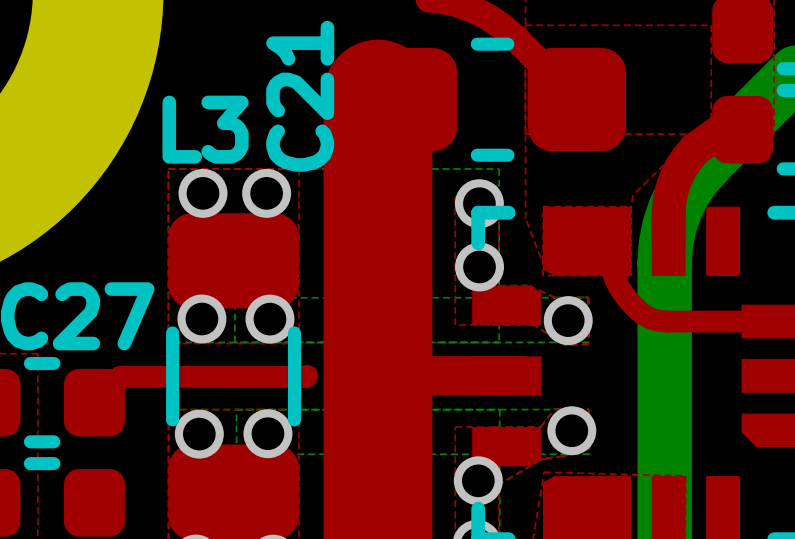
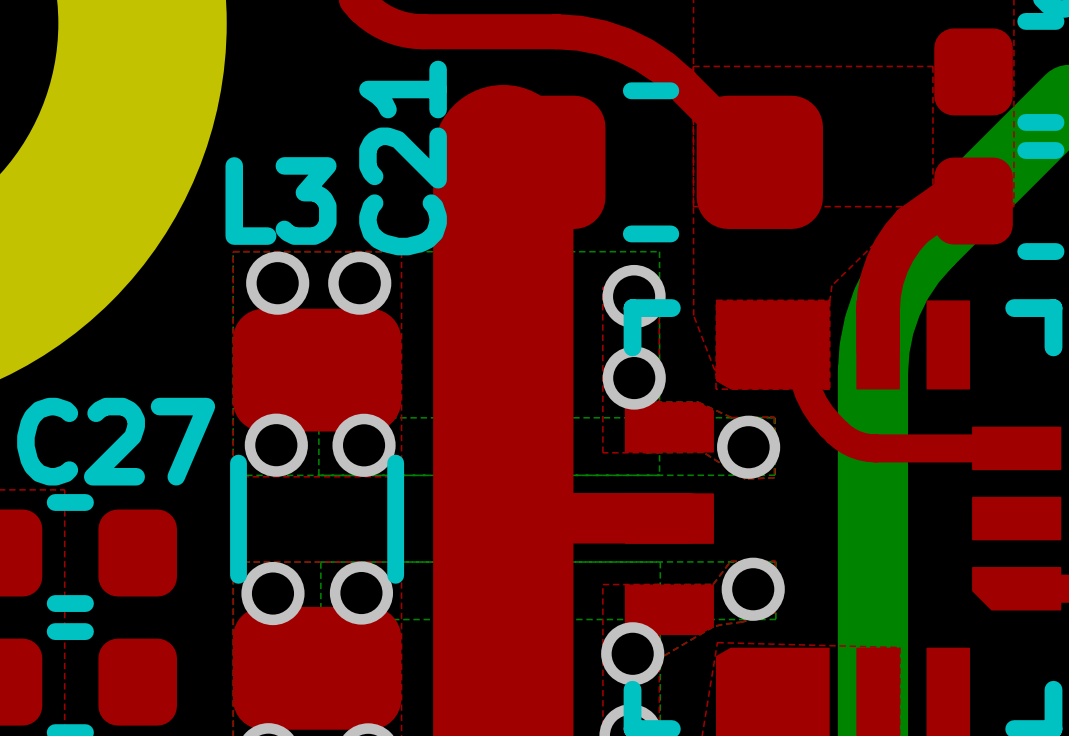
top track: (306, 376) (120, 376) (94, 402) -> none

